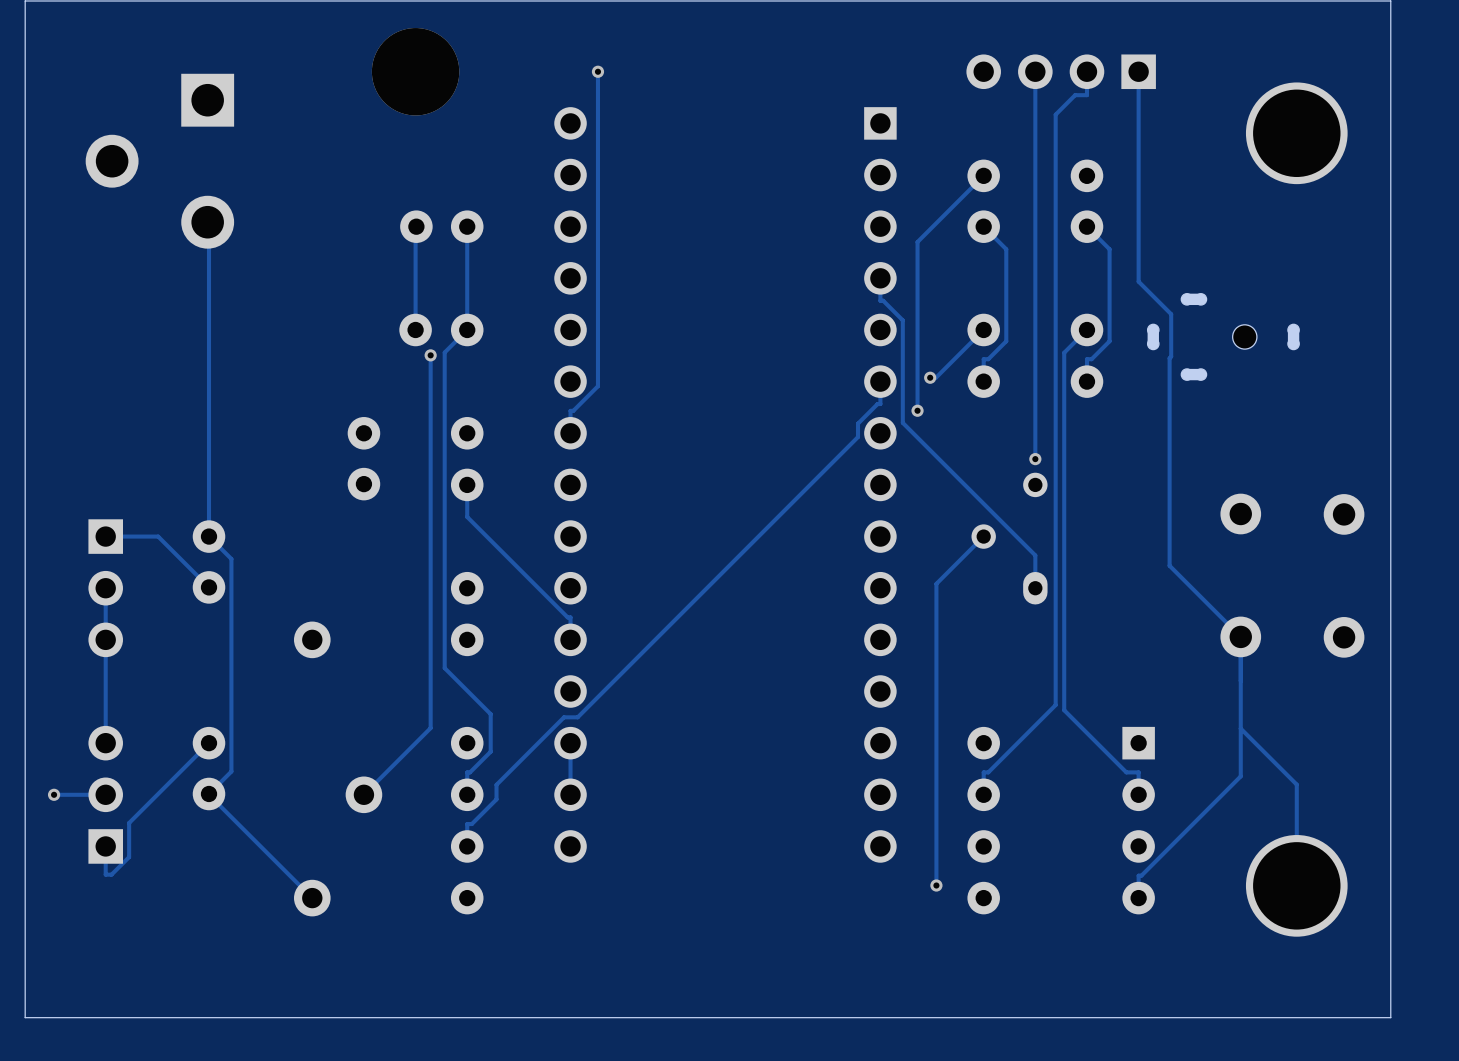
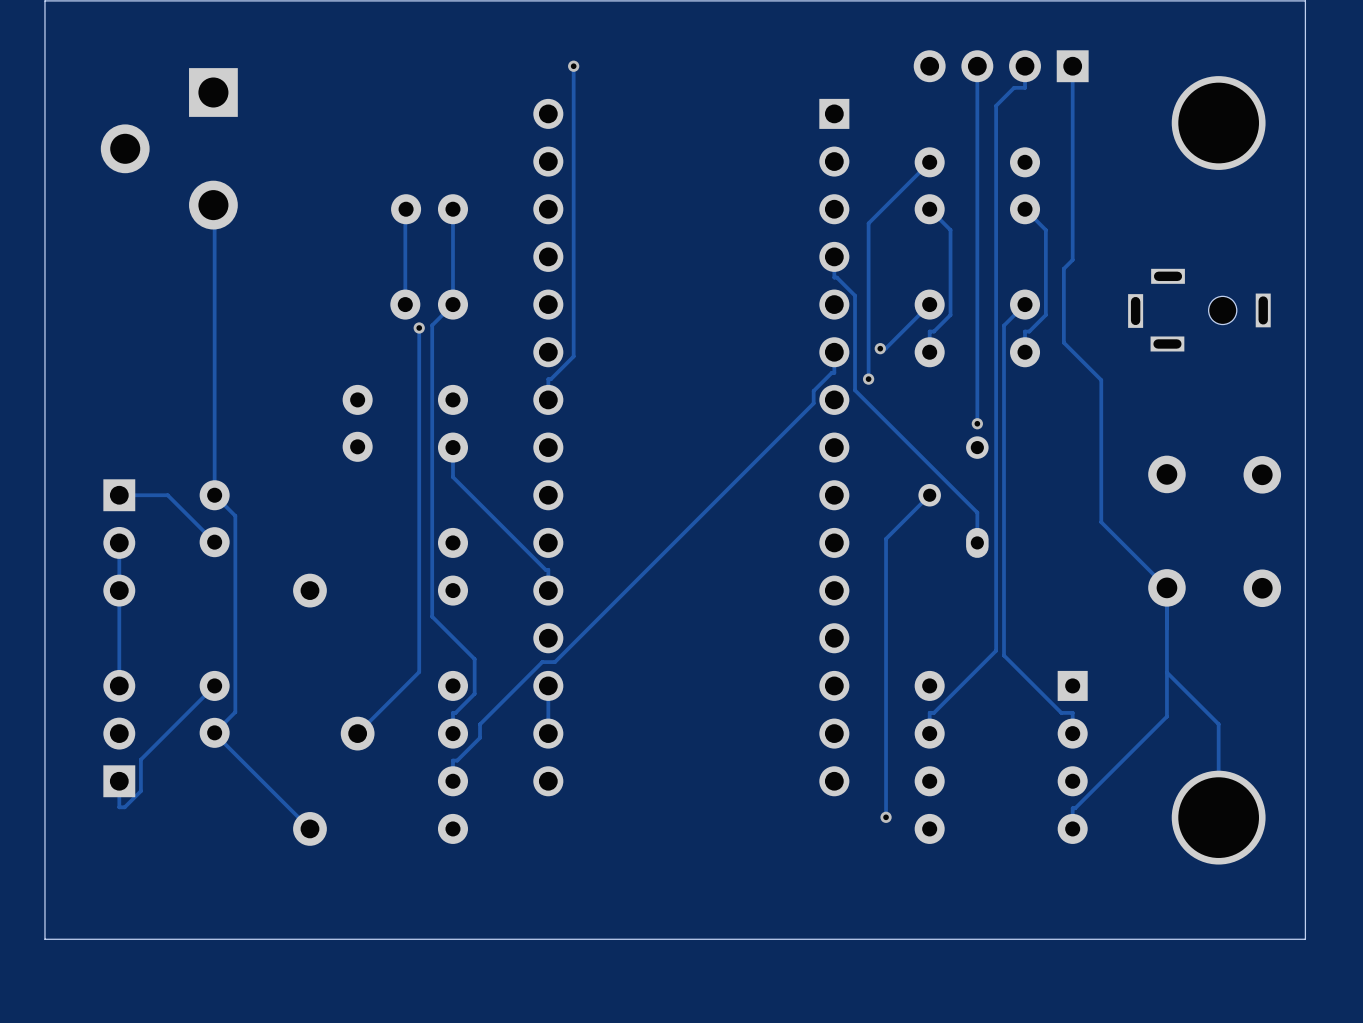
part: (415, 71) -> none
track: (1138, 281) (1171, 314) (1169, 411) -> (1072, 259) (1063, 268) (1063, 342) (1101, 380)
part: (1223, 336) -> none
part: none -> (1199, 310)
via: (54, 794) -> none
track: (105, 794) (54, 794) -> none

